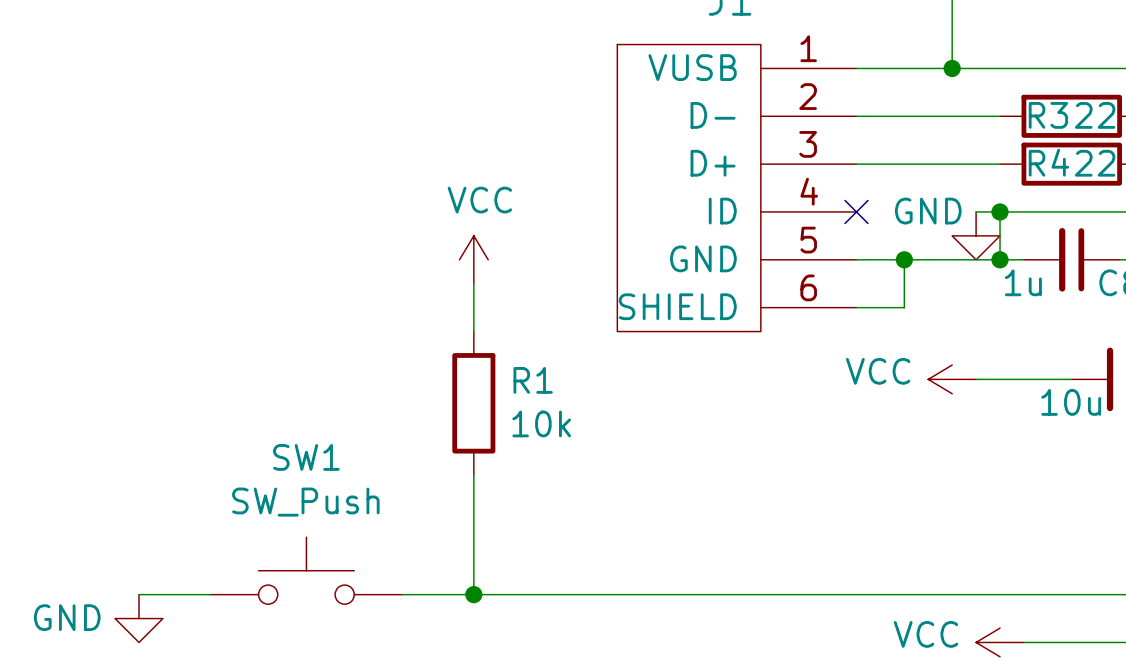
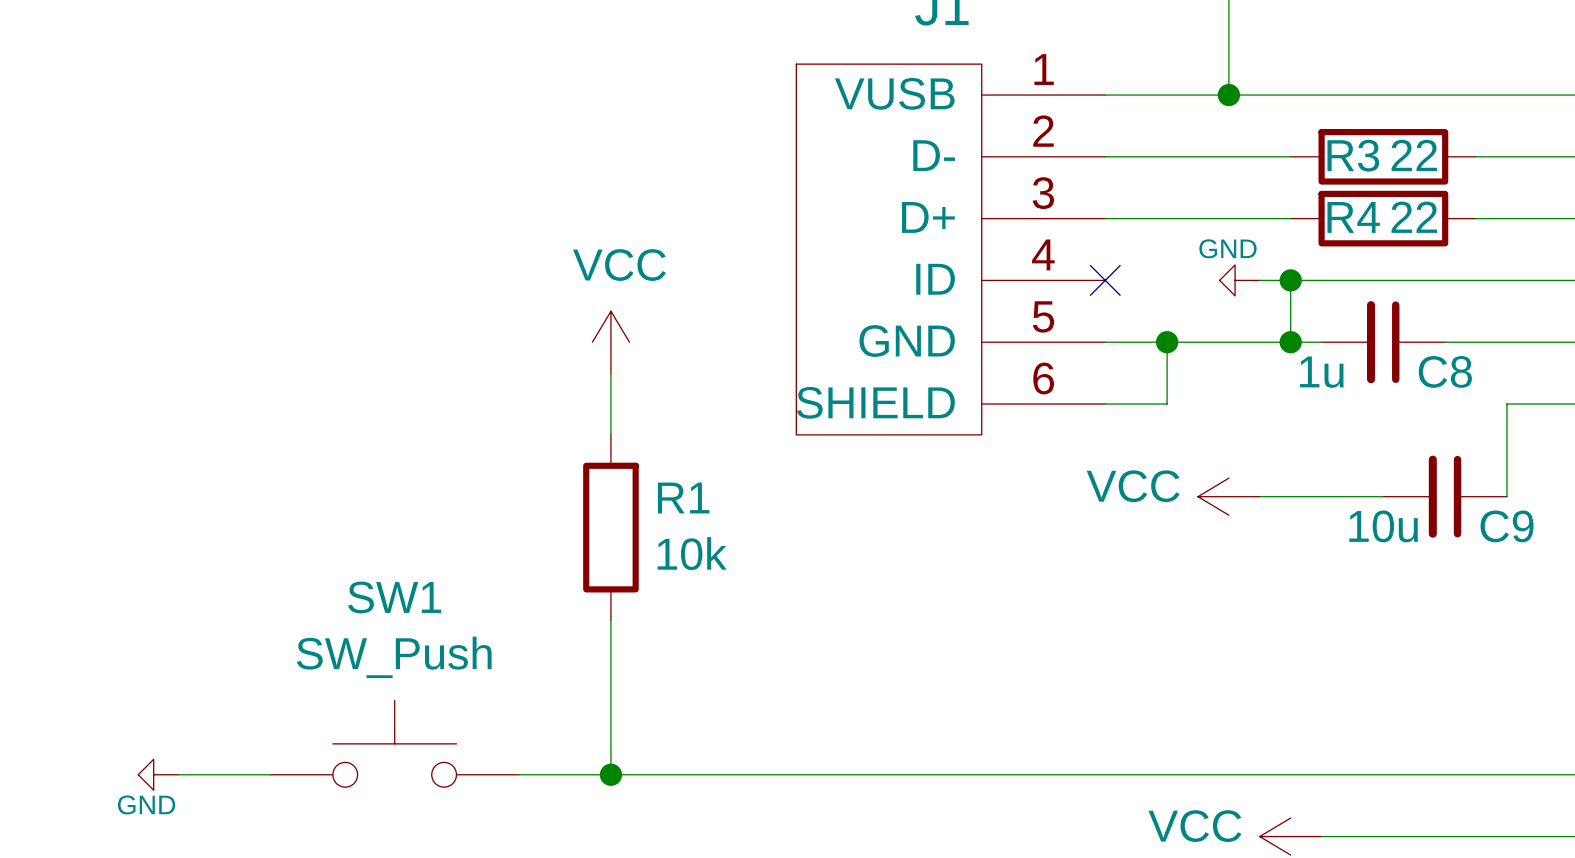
power symbol: none -> GND (1239, 280)
power symbol: GND (976, 235) -> none
power symbol: none -> GND (158, 774)
power symbol: GND (139, 618) -> none

